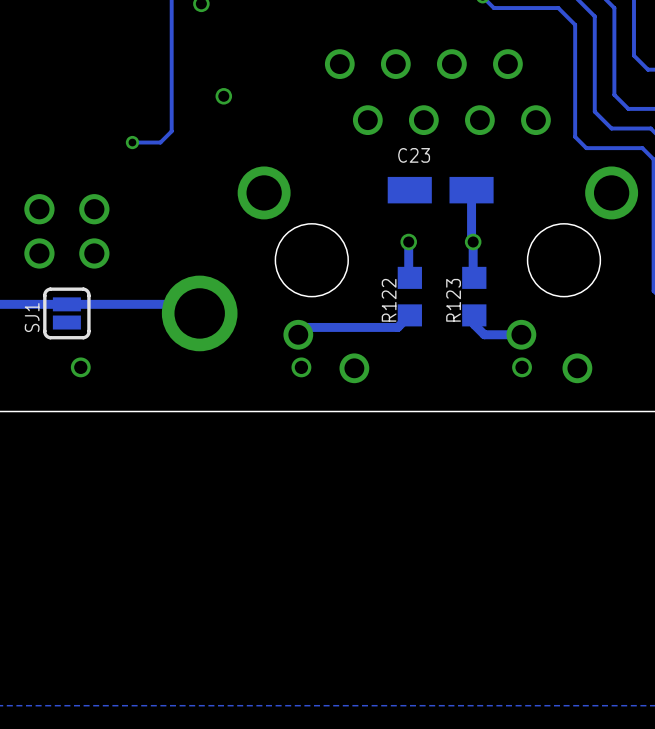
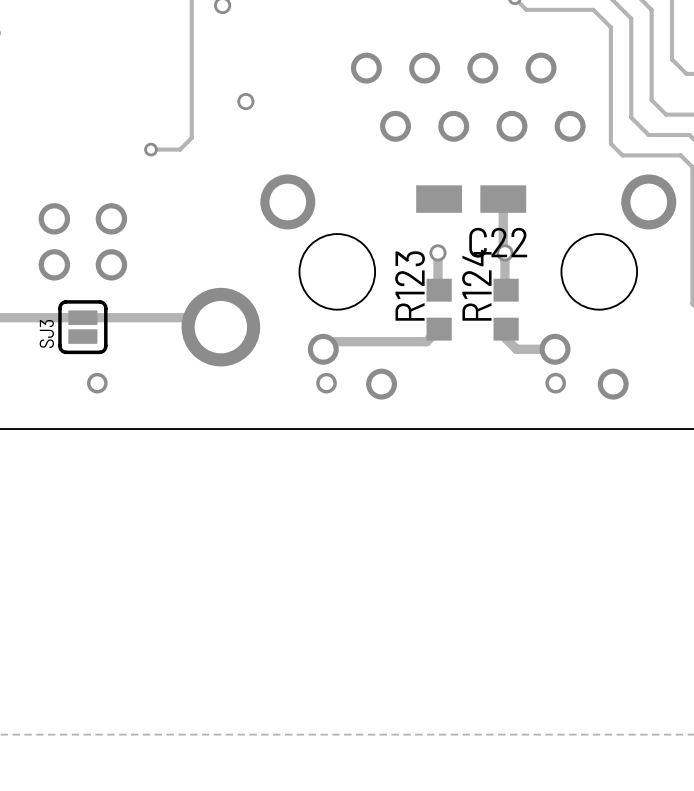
C23 name: C23 (414, 155) -> C22 (498, 242)
R122 name: R122 (389, 300) -> R123 (410, 286)
R123 name: R123 (453, 300) -> R124 (476, 285)
SJ1 name: SJ1 (32, 317) -> SJ3 (46, 333)

